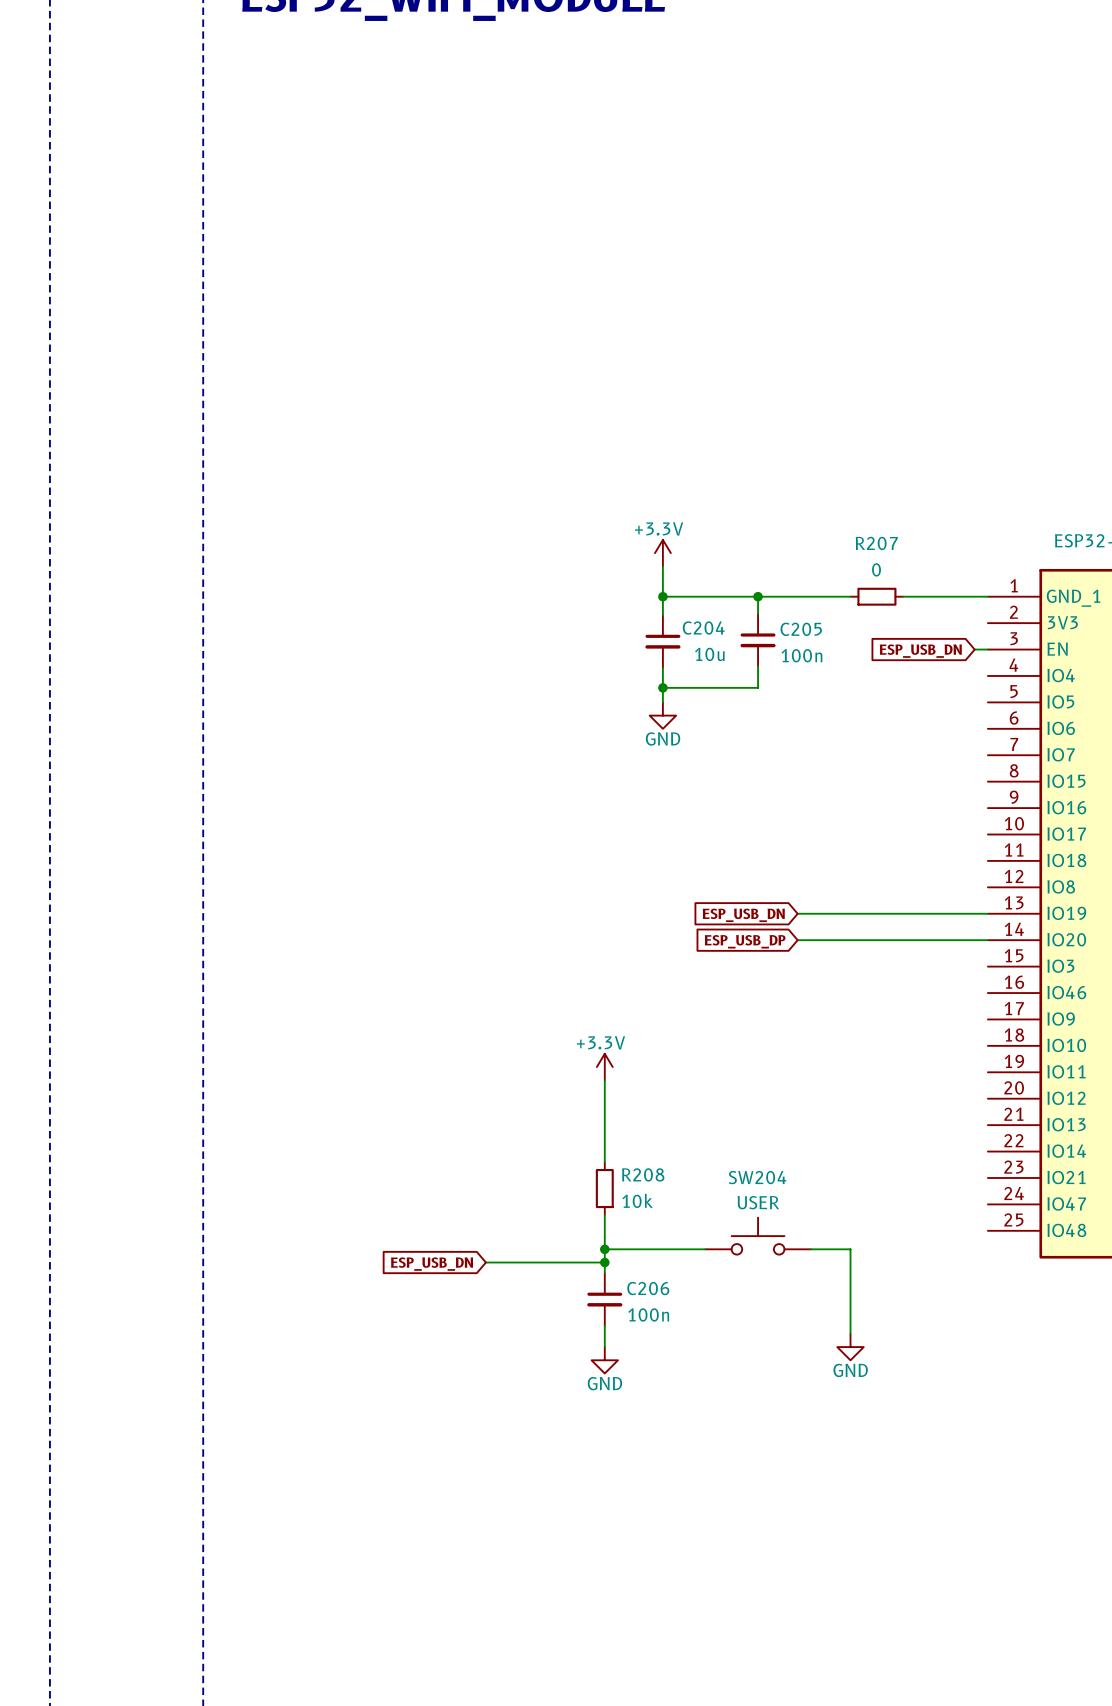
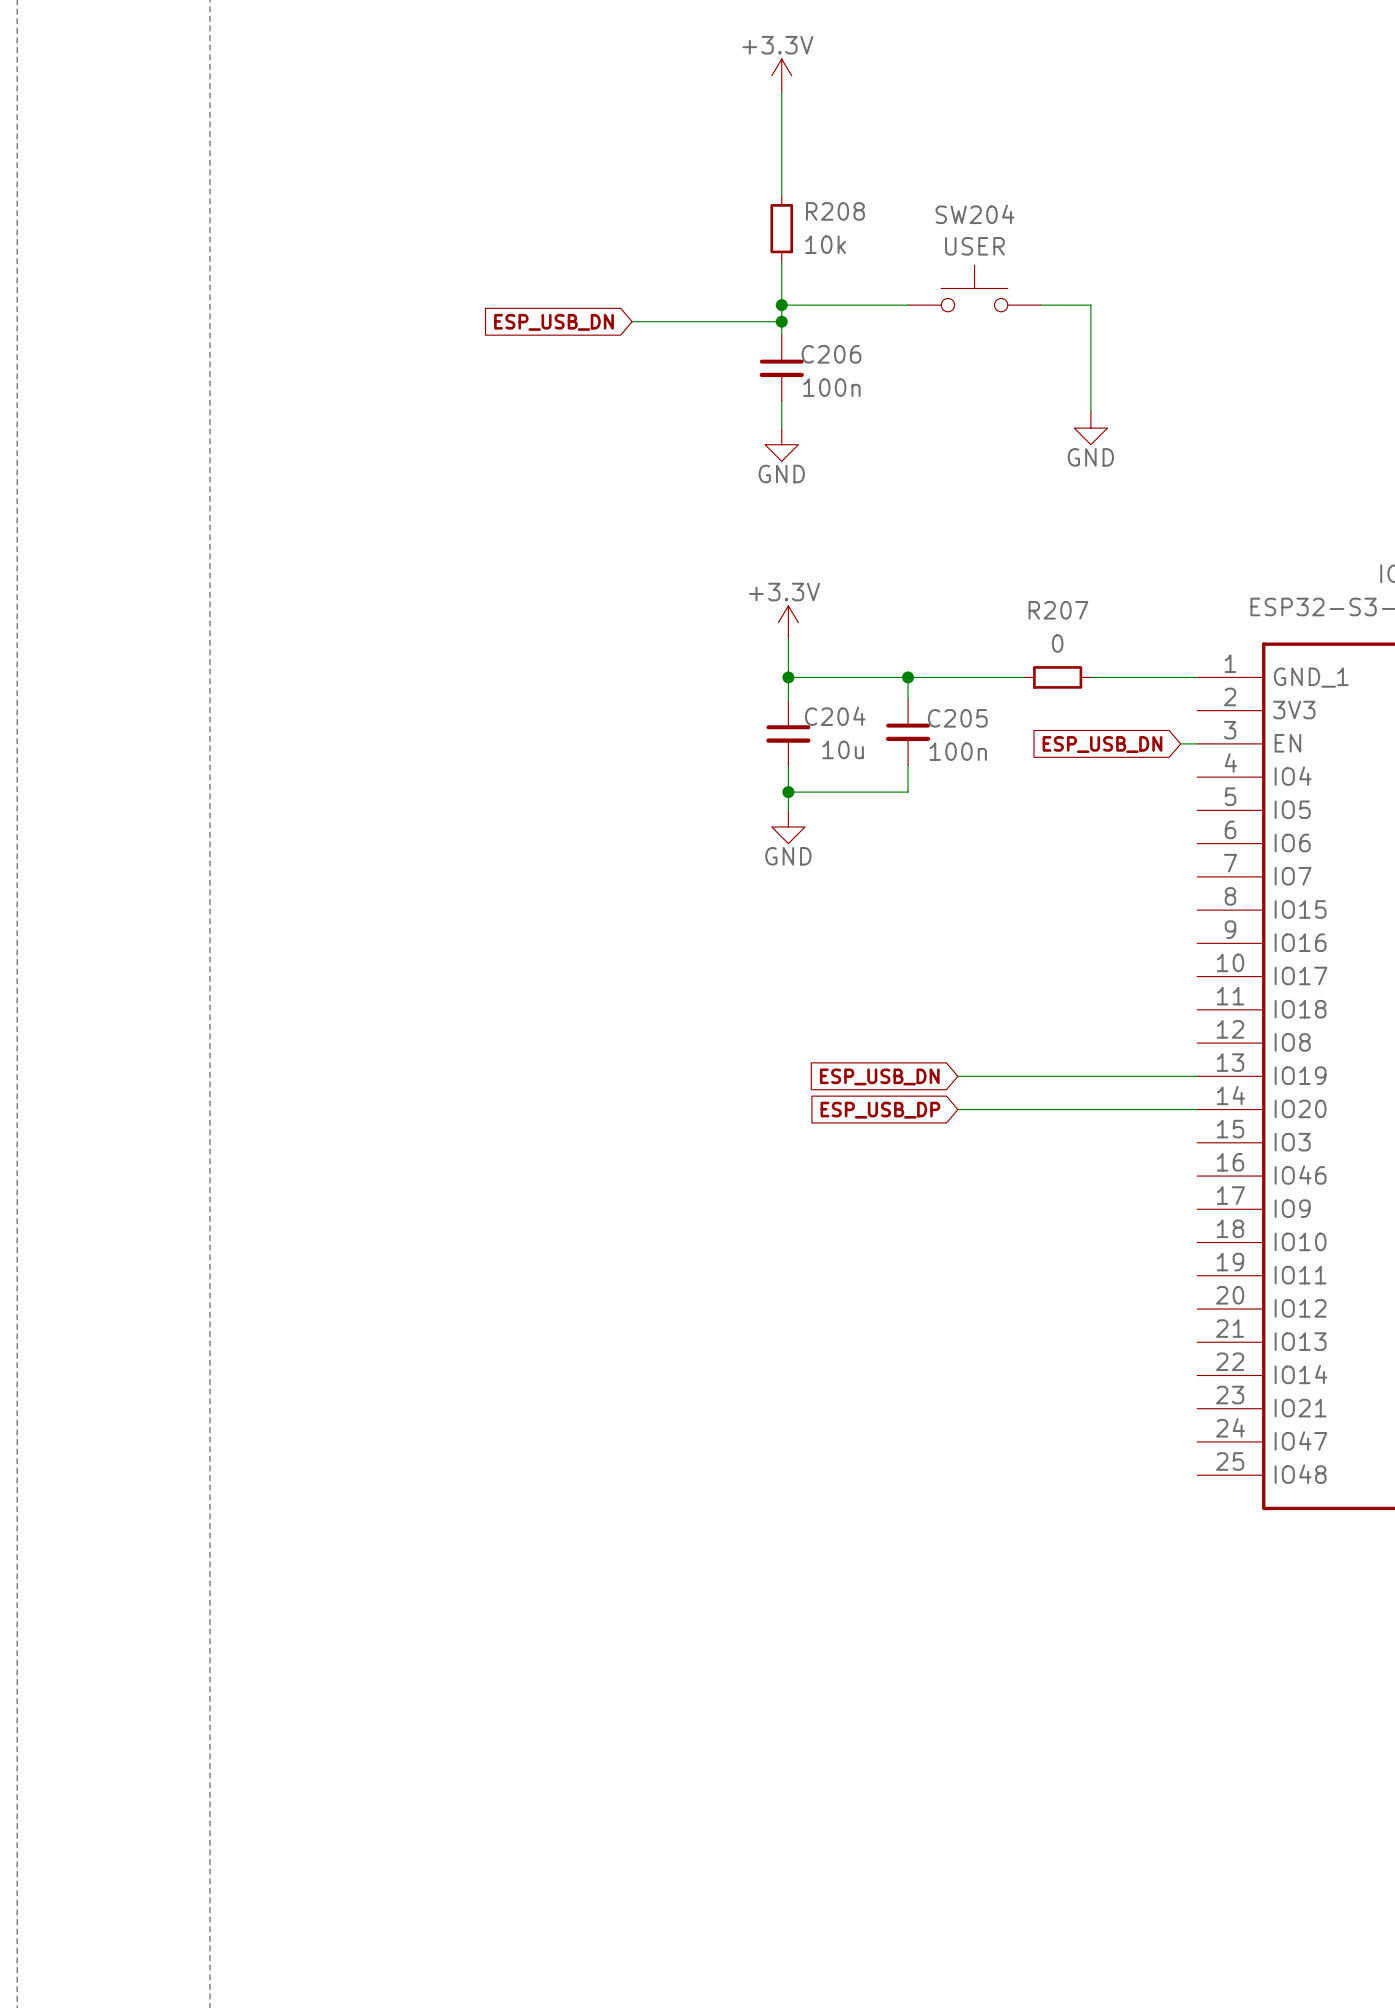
power symbol: none -> +3.3V (781, 75)
wire: none -> (781, 92) (781, 195)
wire: none -> (781, 261) (781, 335)
wire: none -> (781, 305) (908, 305)
junction: none -> (781, 305)
wire: none -> (1041, 305) (1090, 305) (1090, 411)
wire: none -> (632, 321) (781, 321)
junction: none -> (781, 321)
global label: none -> ESP_USB_DN (554, 322)
wire: none -> (781, 401) (781, 428)
power symbol: none -> GND (1090, 428)
power symbol: none -> GND (781, 444)
power symbol: +3.3V (604, 1067) -> none
wire: (604, 1080) (604, 1162) -> none
R208 position: (604, 1188) -> (781, 228)
wire: (604, 1214) (604, 1273) -> none
SW204 position: (758, 1236) -> (974, 288)
wire: (604, 1249) (705, 1249) -> none
junction: (604, 1249) -> none
wire: (810, 1249) (850, 1249) (850, 1333) -> none
wire: (485, 1262) (604, 1262) -> none
junction: (604, 1262) -> none
global label: ESP_USB_DN (431, 1264) -> none
C206 position: (604, 1299) -> (781, 368)
wire: (604, 1325) (604, 1347) -> none
power symbol: GND (850, 1347) -> none
power symbol: GND (604, 1360) -> none

